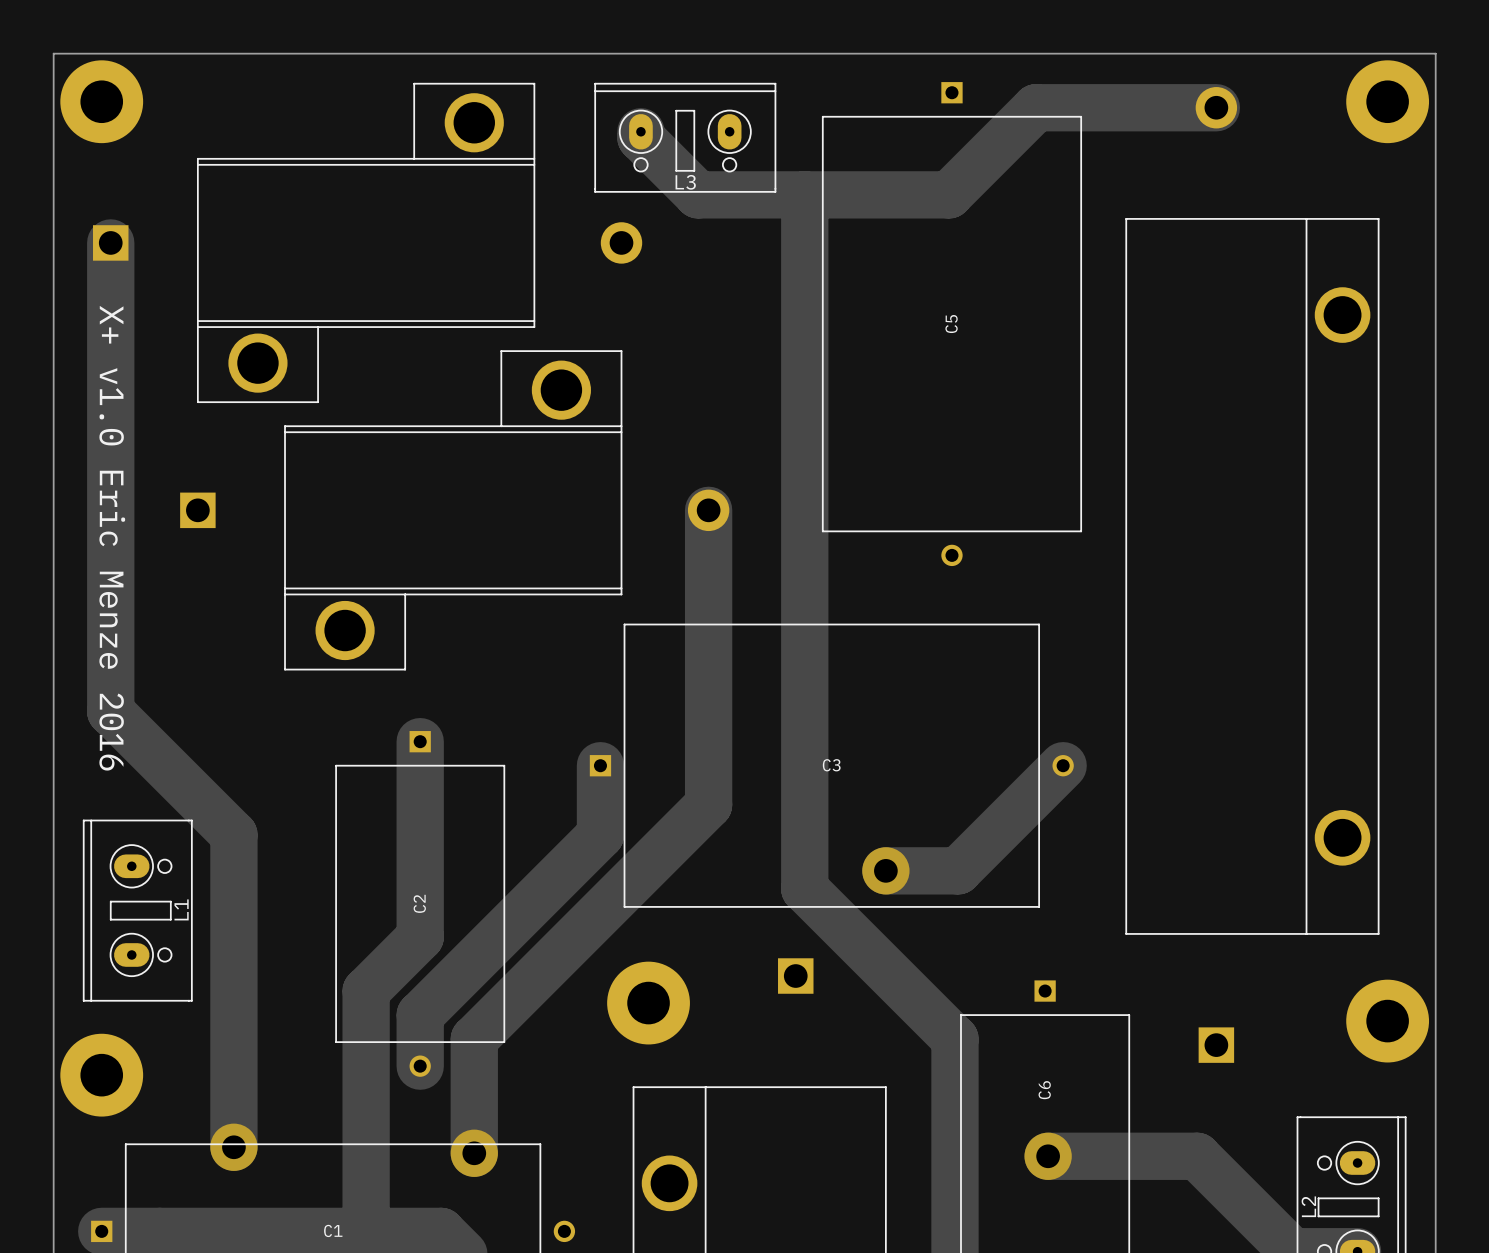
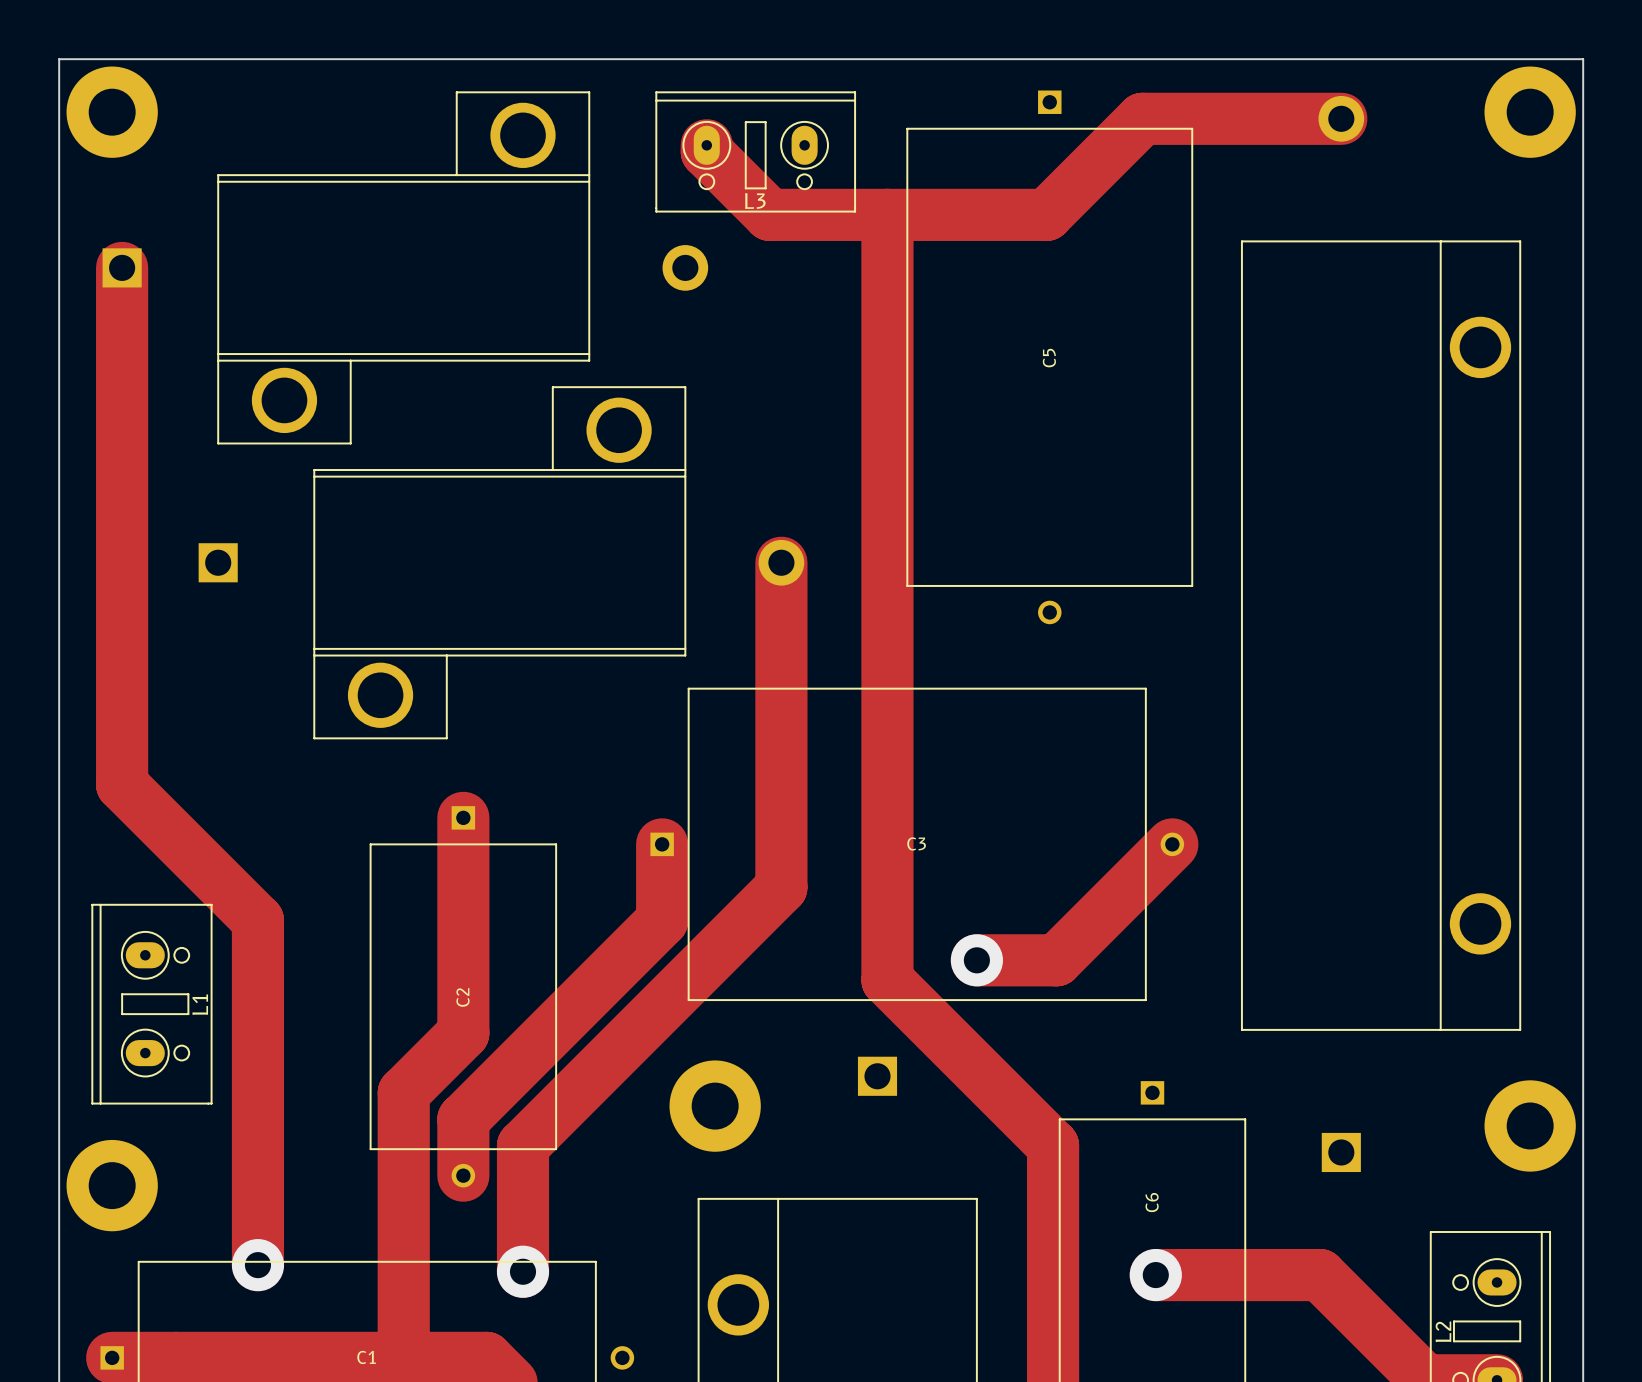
text: X+ v1.0 Eric Menze 2016 (112, 538) -> none

